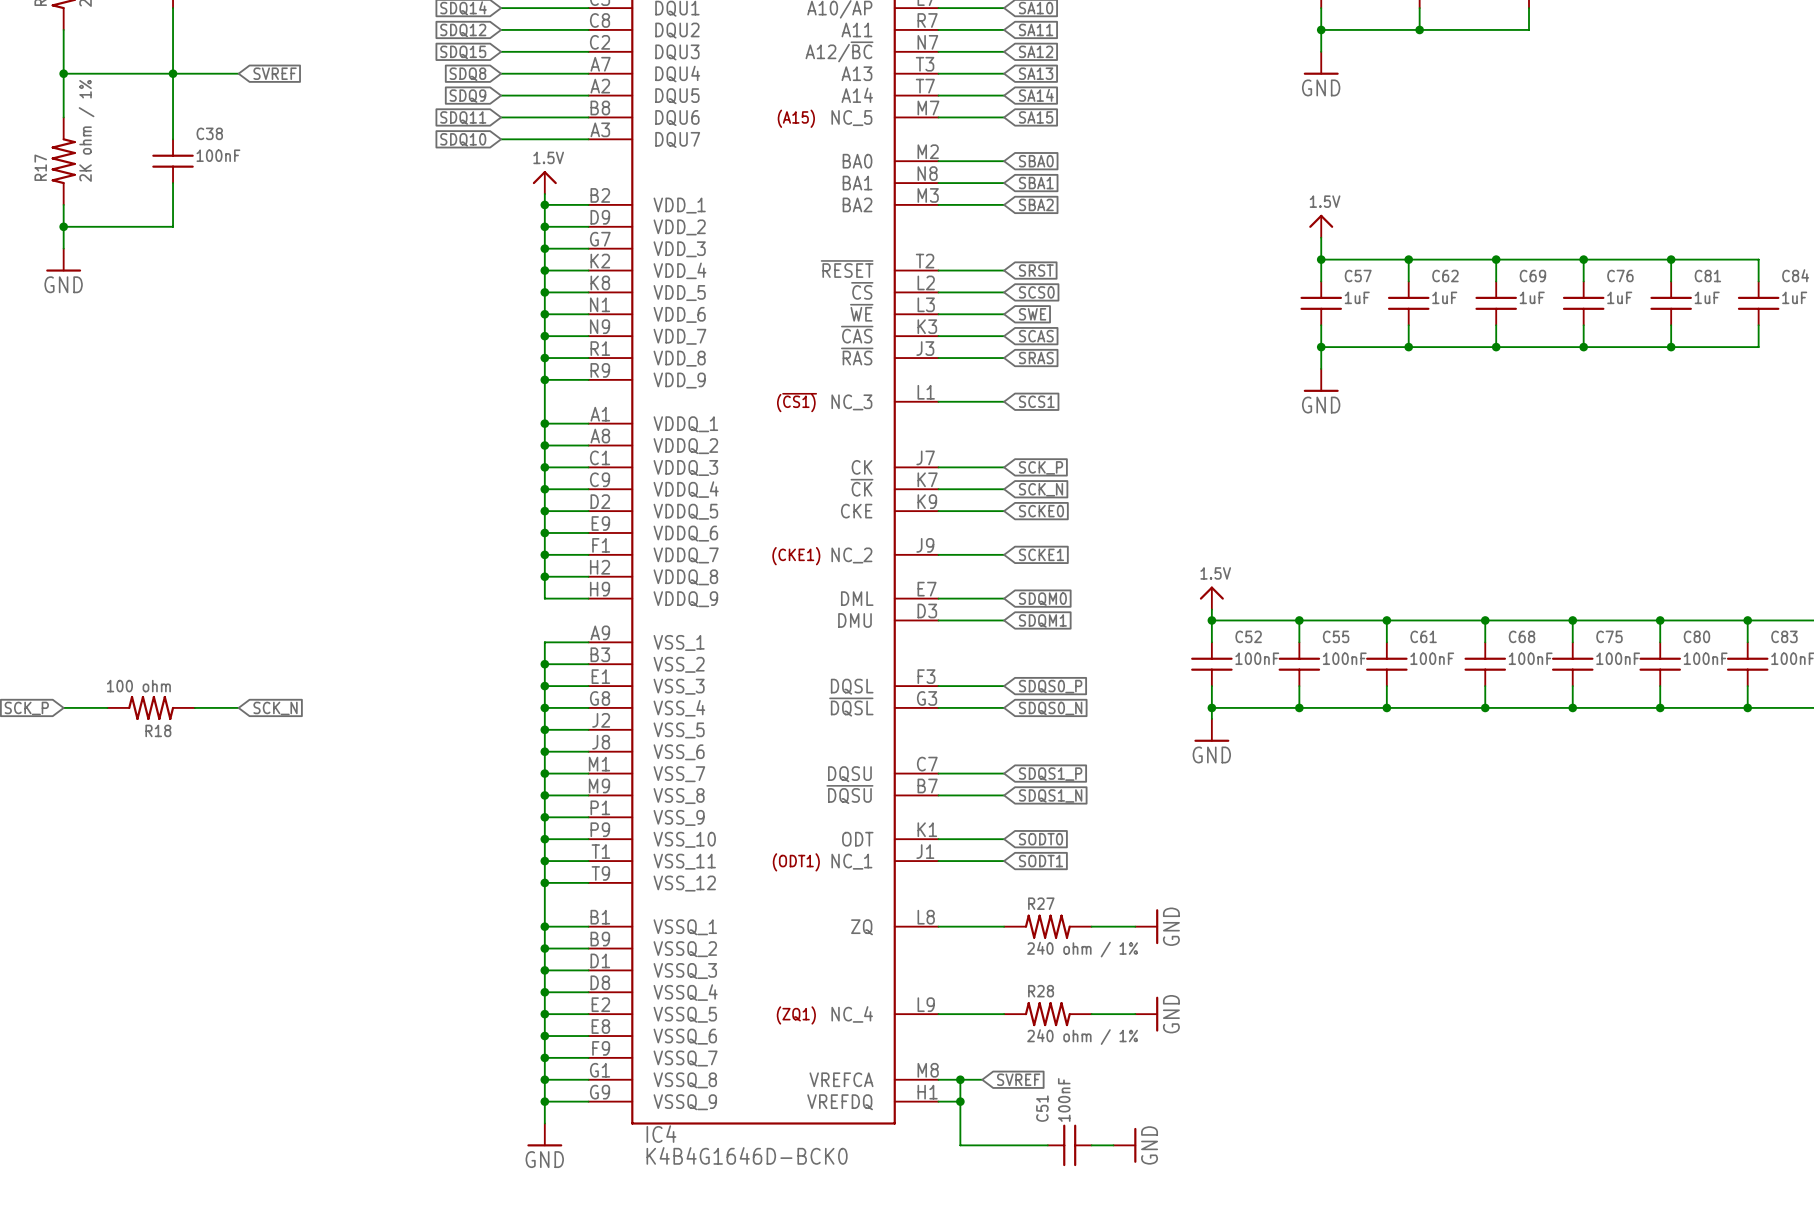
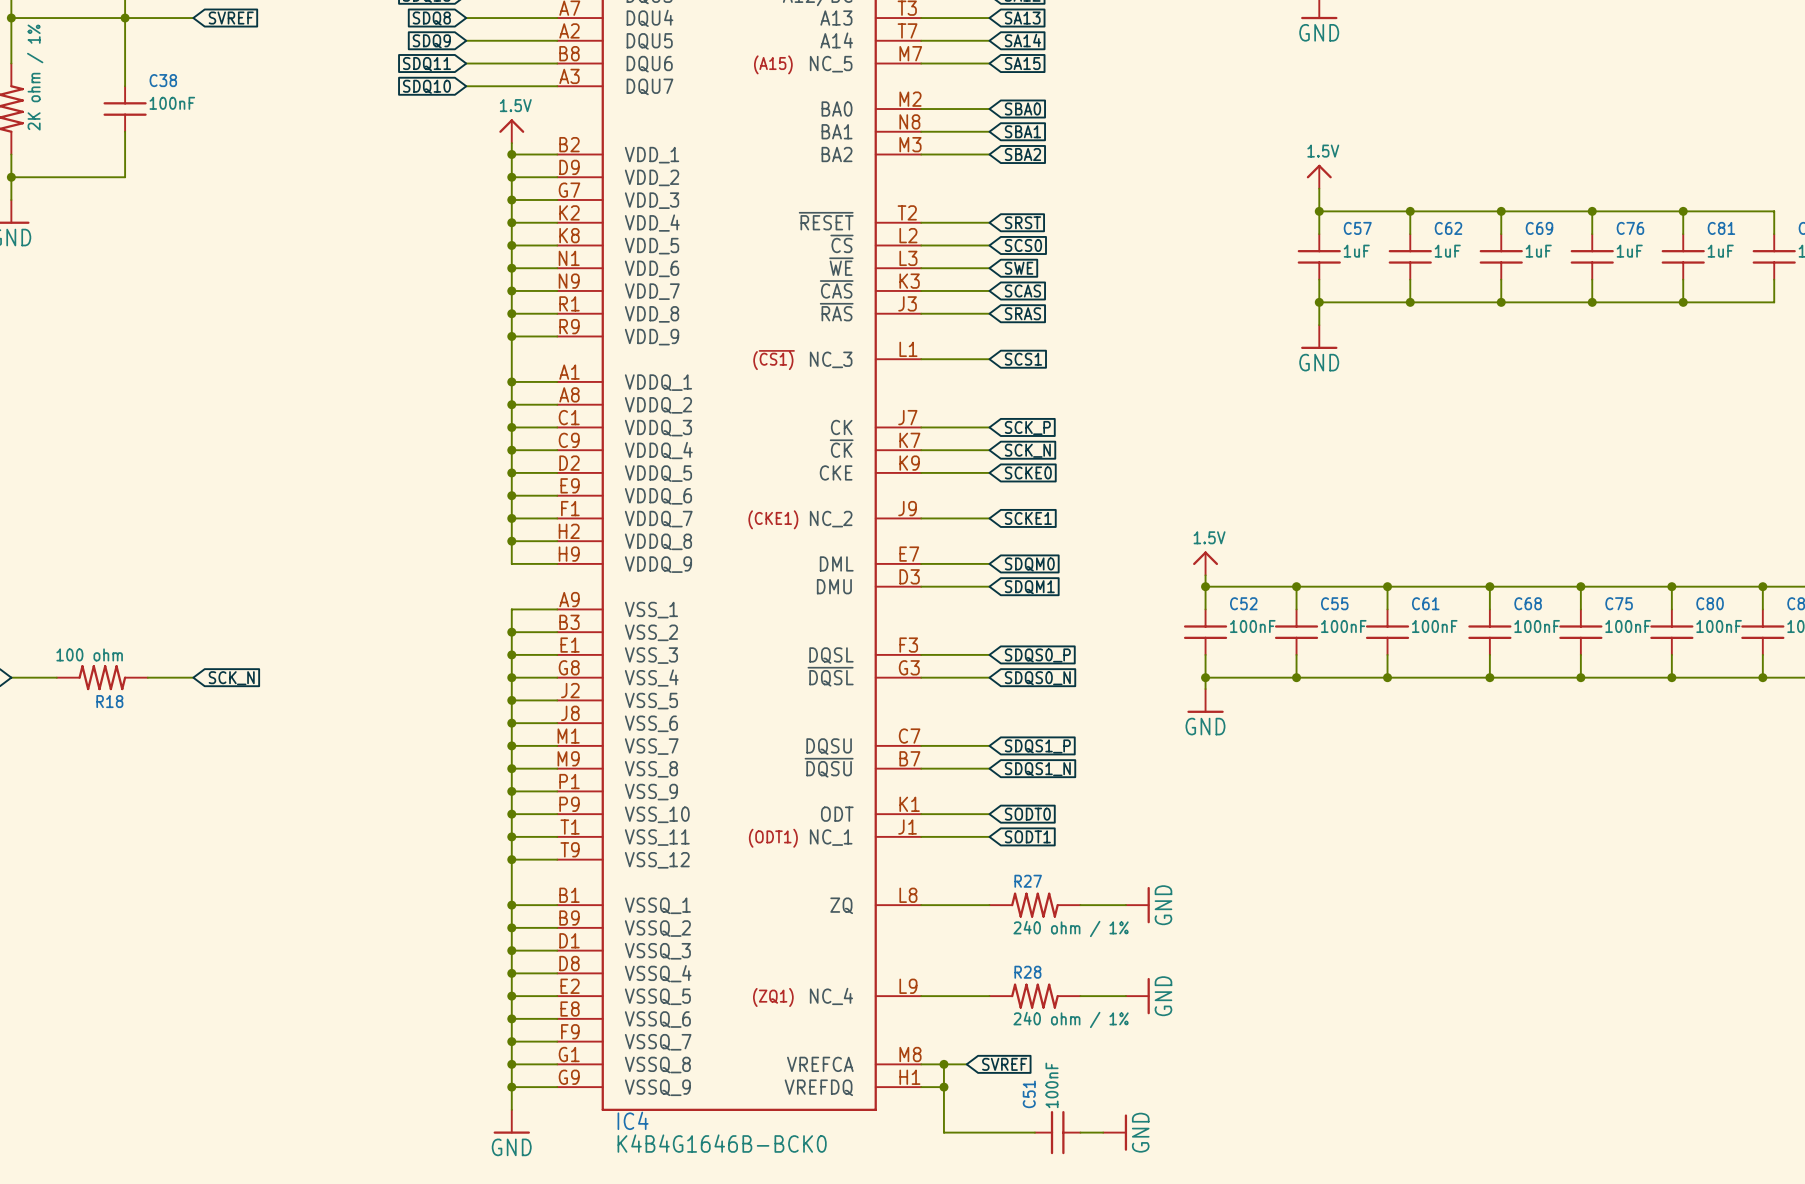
IC4 value: K4B4G1646D-BCK0 (747, 1155) -> K4B4G1646B-BCK0 (722, 1143)

